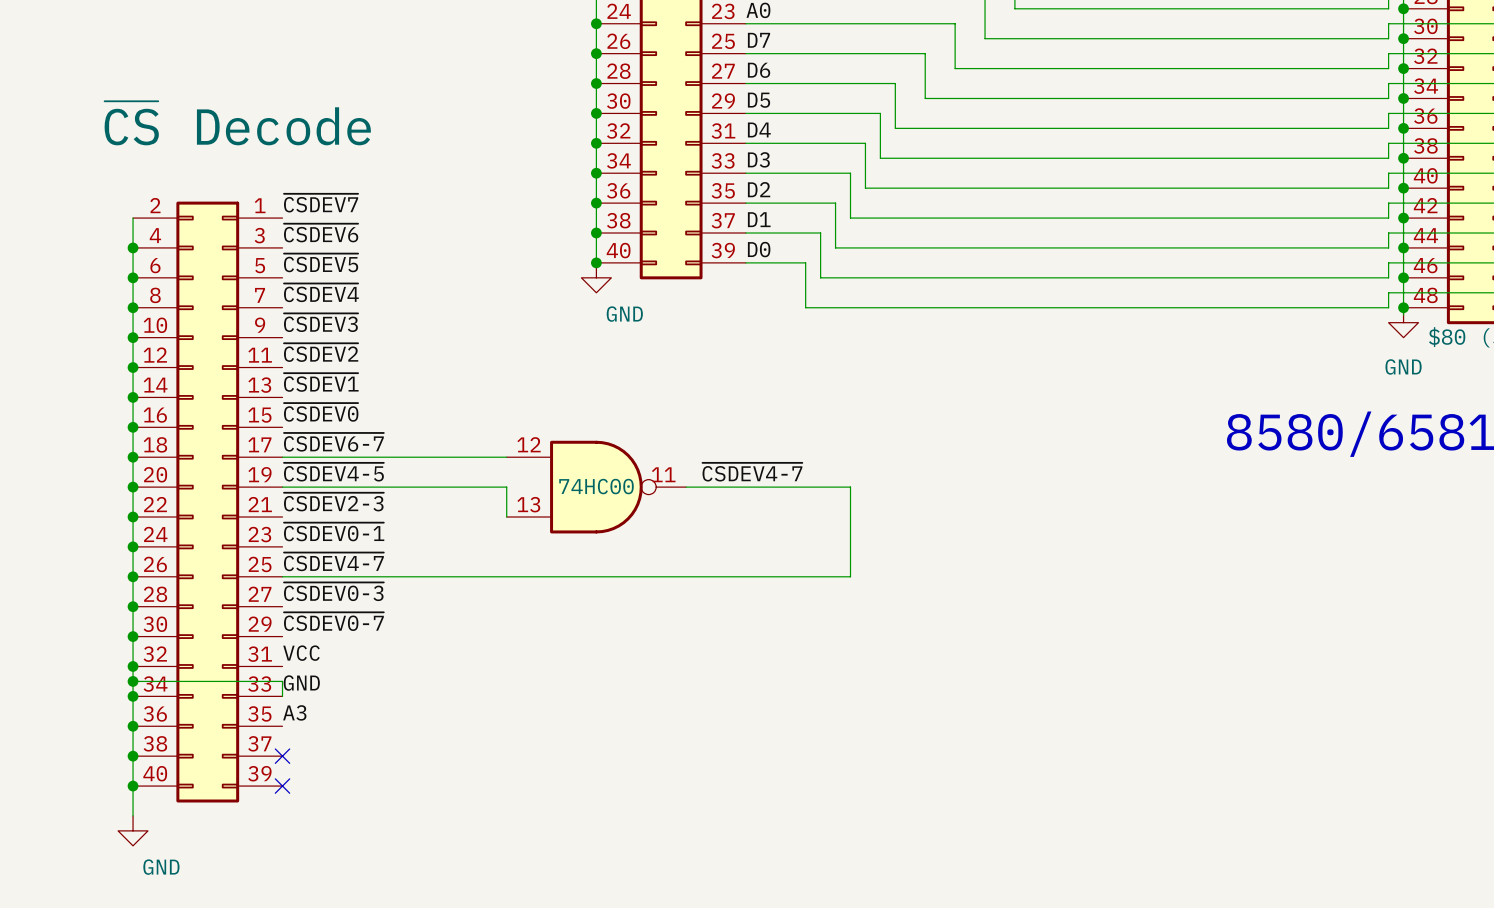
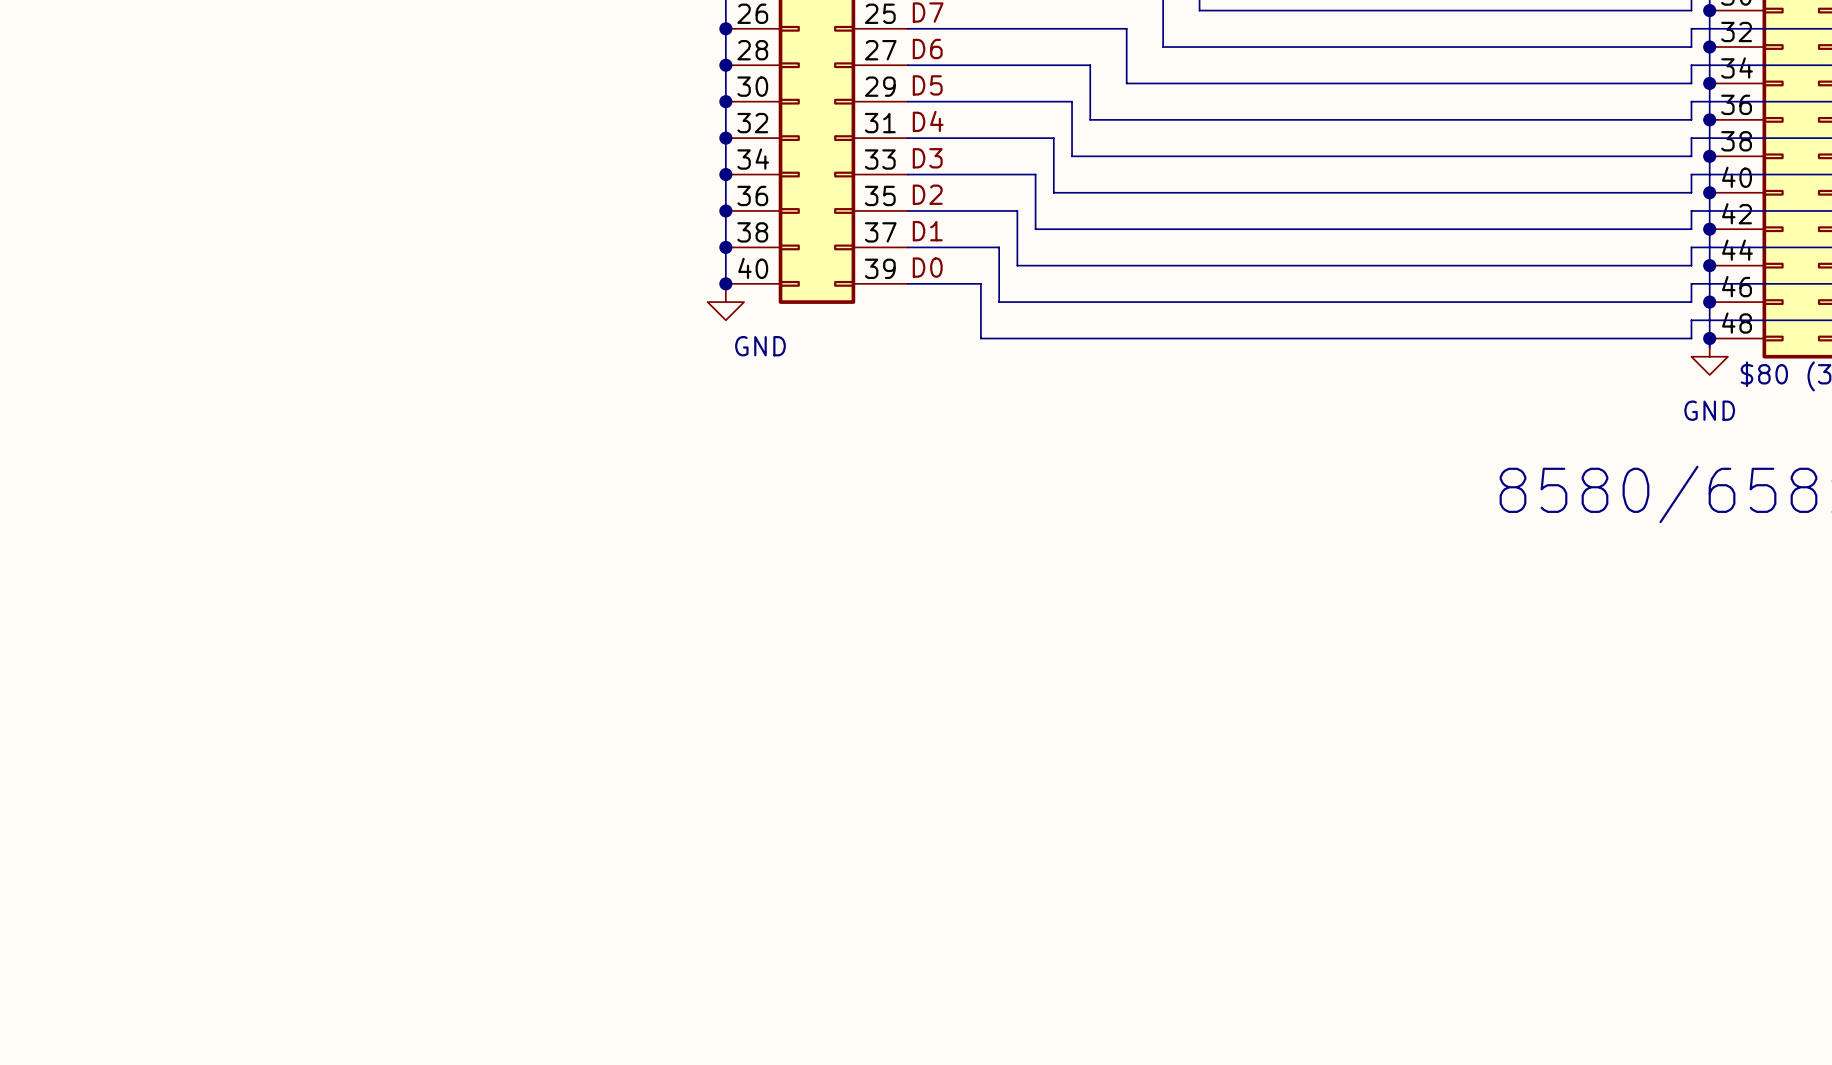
label: ~{CSDEV7} (321, 203) -> none
wire: (133, 218) (133, 815) -> none
label: ~{CSDEV6} (321, 233) -> none
junction: (133, 247) -> none
label: ~{CSDEV5} (321, 262) -> none
junction: (133, 277) -> none
label: ~{CSDEV4} (321, 292) -> none
junction: (133, 307) -> none
label: ~{CSDEV3} (321, 322) -> none
junction: (133, 337) -> none
label: ~{CSDEV2} (321, 352) -> none
junction: (133, 367) -> none
label: ~{CSDEV1} (321, 382) -> none
junction: (133, 397) -> none
label: ~{CSDEV0} (321, 412) -> none
junction: (133, 427) -> none
label: ~{CSDEV6-7} (333, 442) -> none
junction: (133, 457) -> none
wire: (282, 457) (506, 457) -> none
label: ~{CSDEV4-5} (333, 472) -> none
label: ~{CSDEV4-7} (752, 472) -> none
junction: (133, 487) -> none
wire: (282, 487) (506, 487) (506, 517) -> none
part: 74HC00 (596, 487) -> none
wire: (686, 487) (850, 487) (850, 576) (282, 576) -> none
part: ~{CS} Decode (207, 502) -> none
label: ~{CSDEV2-3} (333, 502) -> none
junction: (133, 517) -> none
label: ~{CSDEV0-1} (334, 531) -> none
junction: (133, 546) -> none
label: ~{CSDEV4-7} (333, 561) -> none
junction: (133, 576) -> none
label: ~{CSDEV0-3} (333, 591) -> none
junction: (133, 606) -> none
label: ~{CSDEV0-7} (333, 621) -> none
junction: (133, 636) -> none
label: VCC (301, 653) -> none
junction: (133, 666) -> none
wire: (133, 681) (282, 681) (282, 696) -> none
junction: (133, 681) -> none
label: GND (301, 683) -> none
junction: (133, 696) -> none
label: A3 (294, 712) -> none
junction: (133, 726) -> none
junction: (133, 756) -> none
no-connect mark: (282, 756) -> none
junction: (133, 786) -> none
no-connect mark: (282, 786) -> none
power symbol: GND (133, 830) -> none

